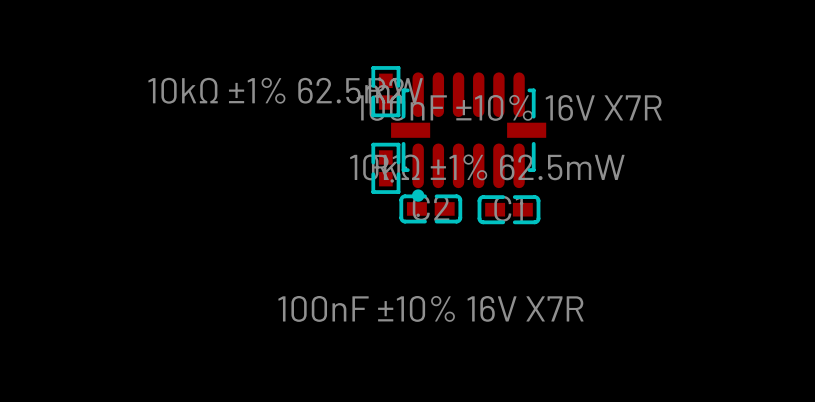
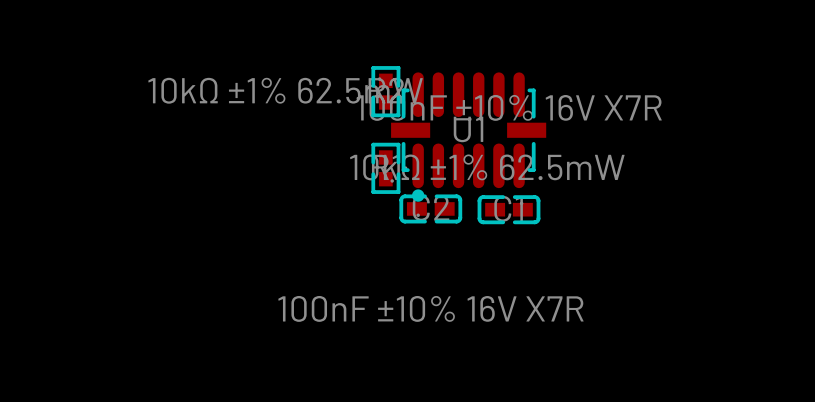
U1 name: none -> U1 (468, 129)

